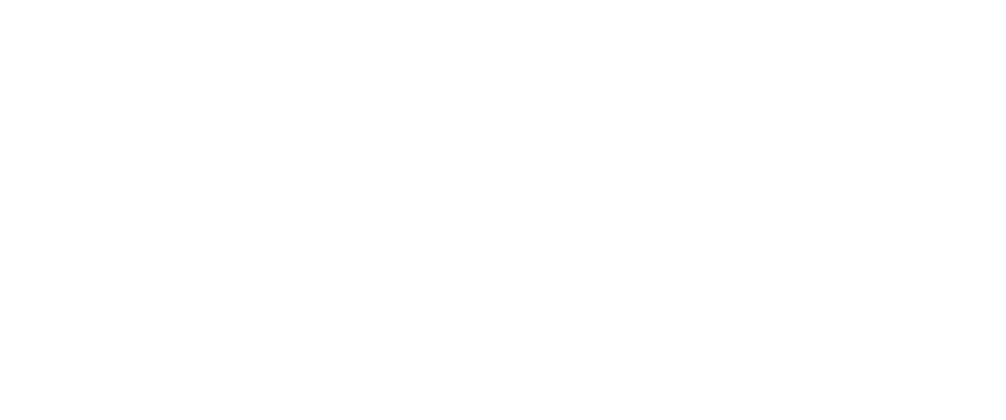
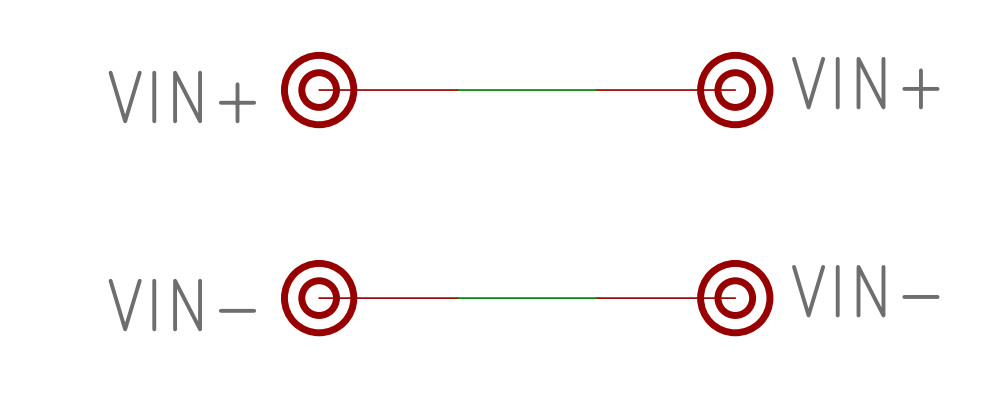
part: none -> VIN+ (369, 90)
wire: none -> (457, 90) (596, 90)
part: none -> VIN+ (684, 90)
part: none -> VIN- (369, 298)
wire: none -> (457, 298) (596, 298)
part: none -> VIN- (684, 298)

